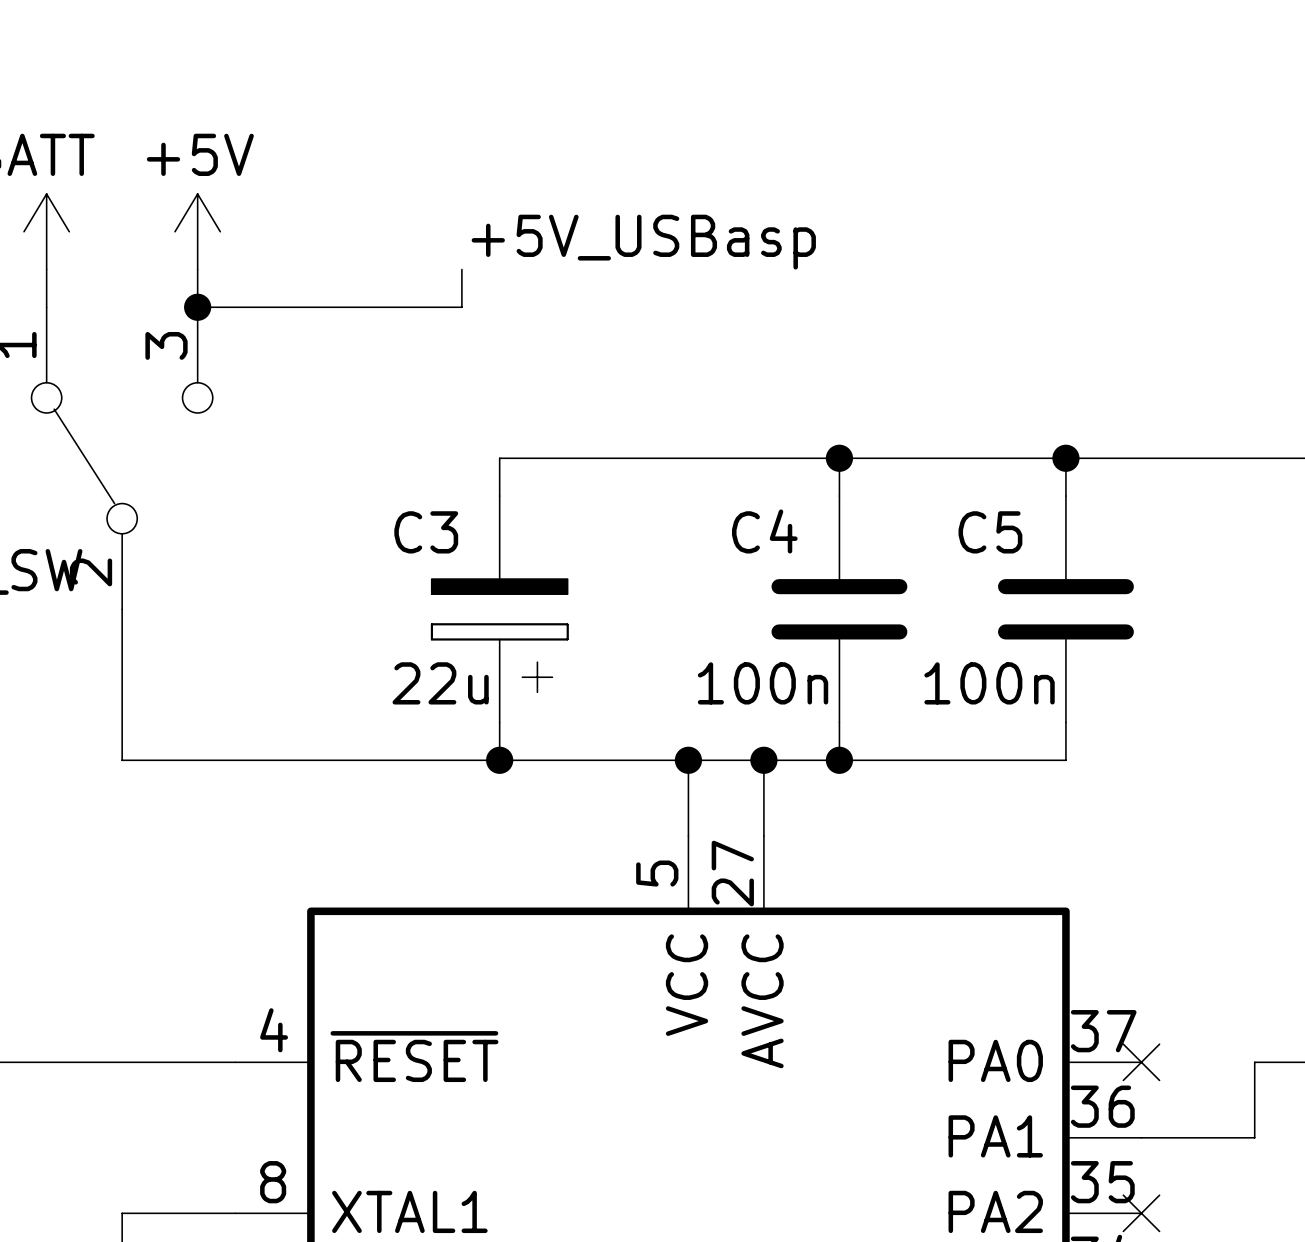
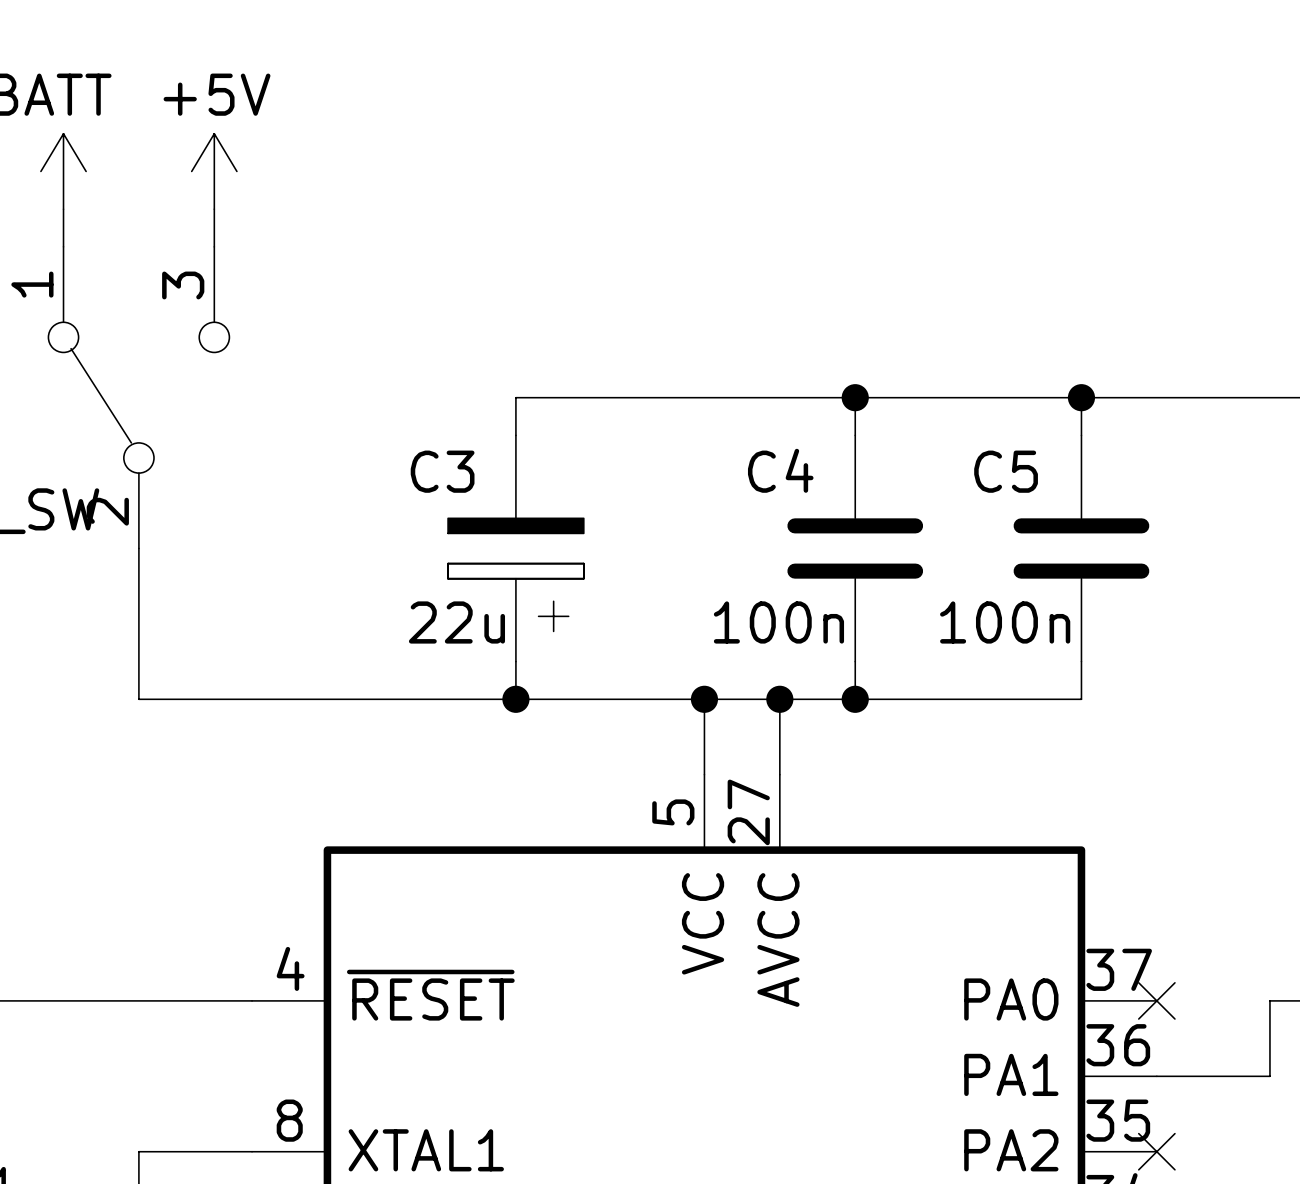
label: +5V_USBasp (643, 242) -> none
wire: (461, 269) (461, 307) (197, 307) -> none
junction: (197, 307) -> none

